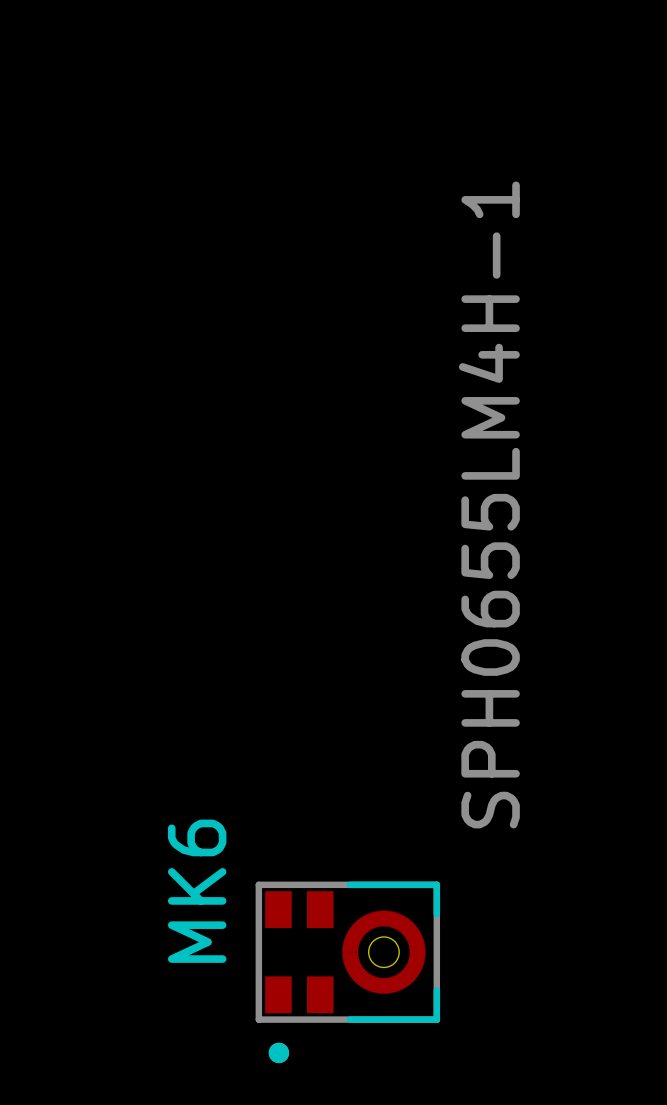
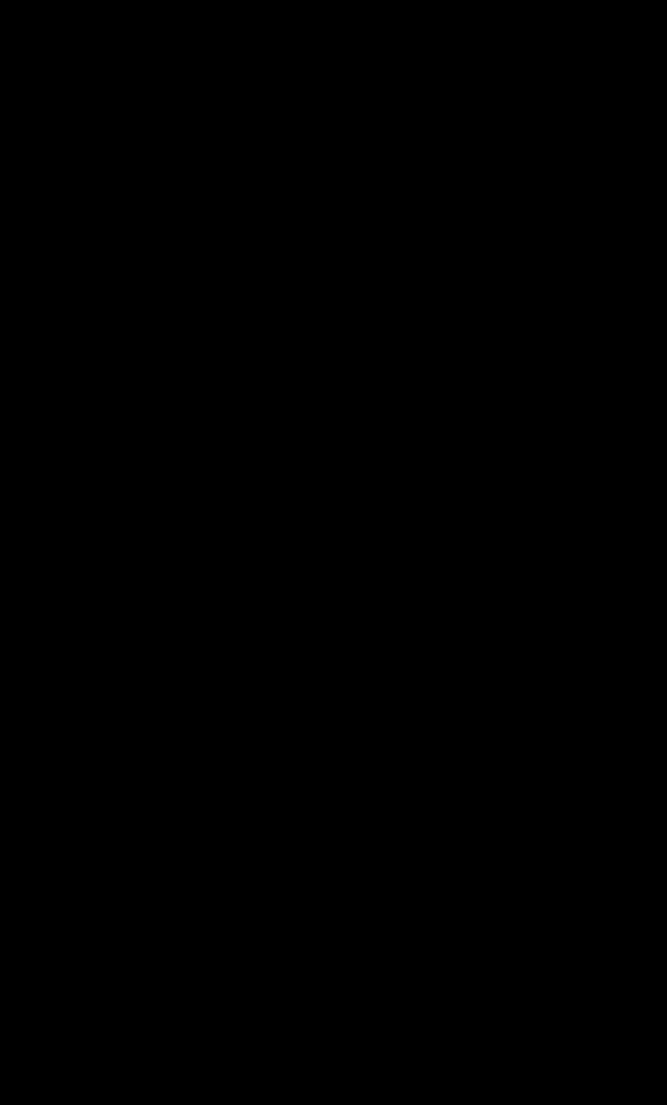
MK6: SPH0655LM4H-1 (347, 972) -> none

